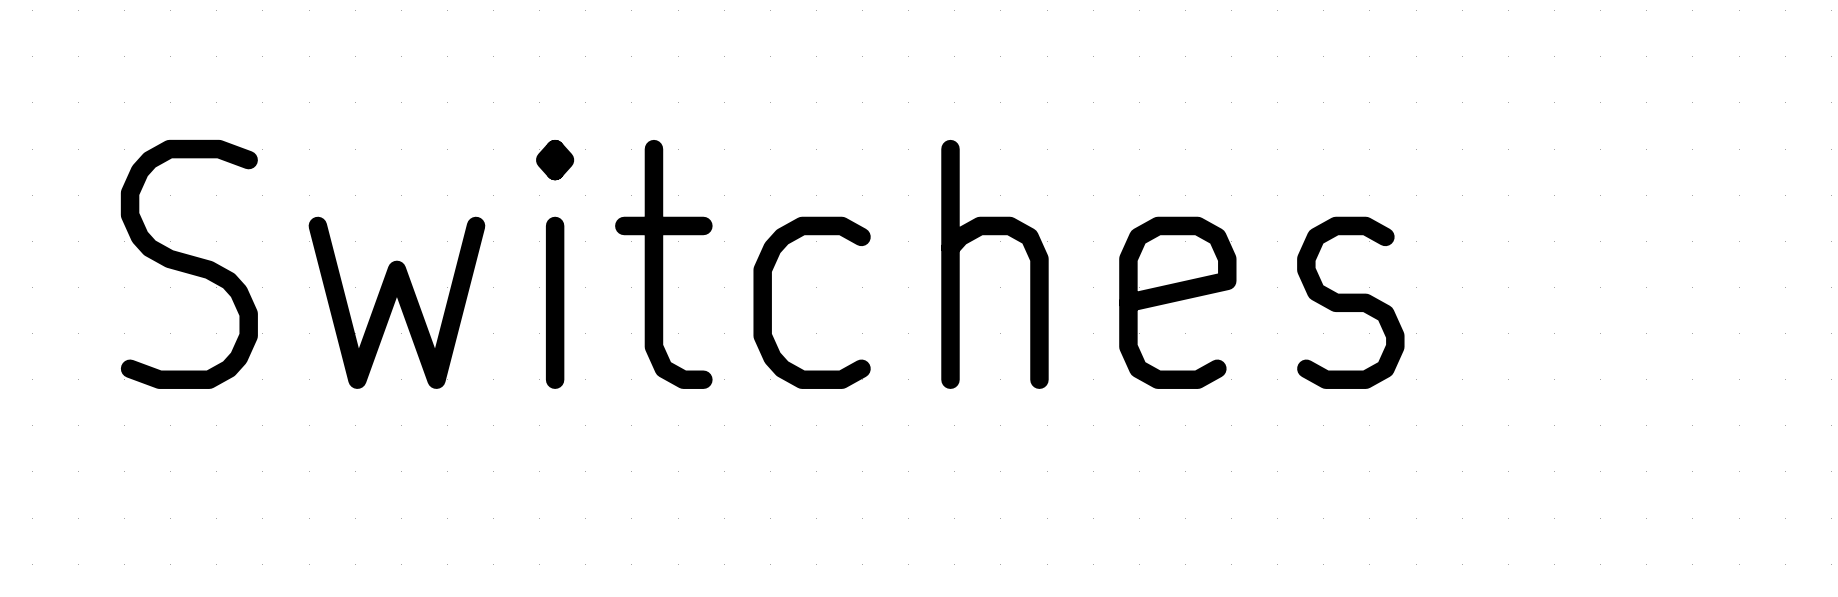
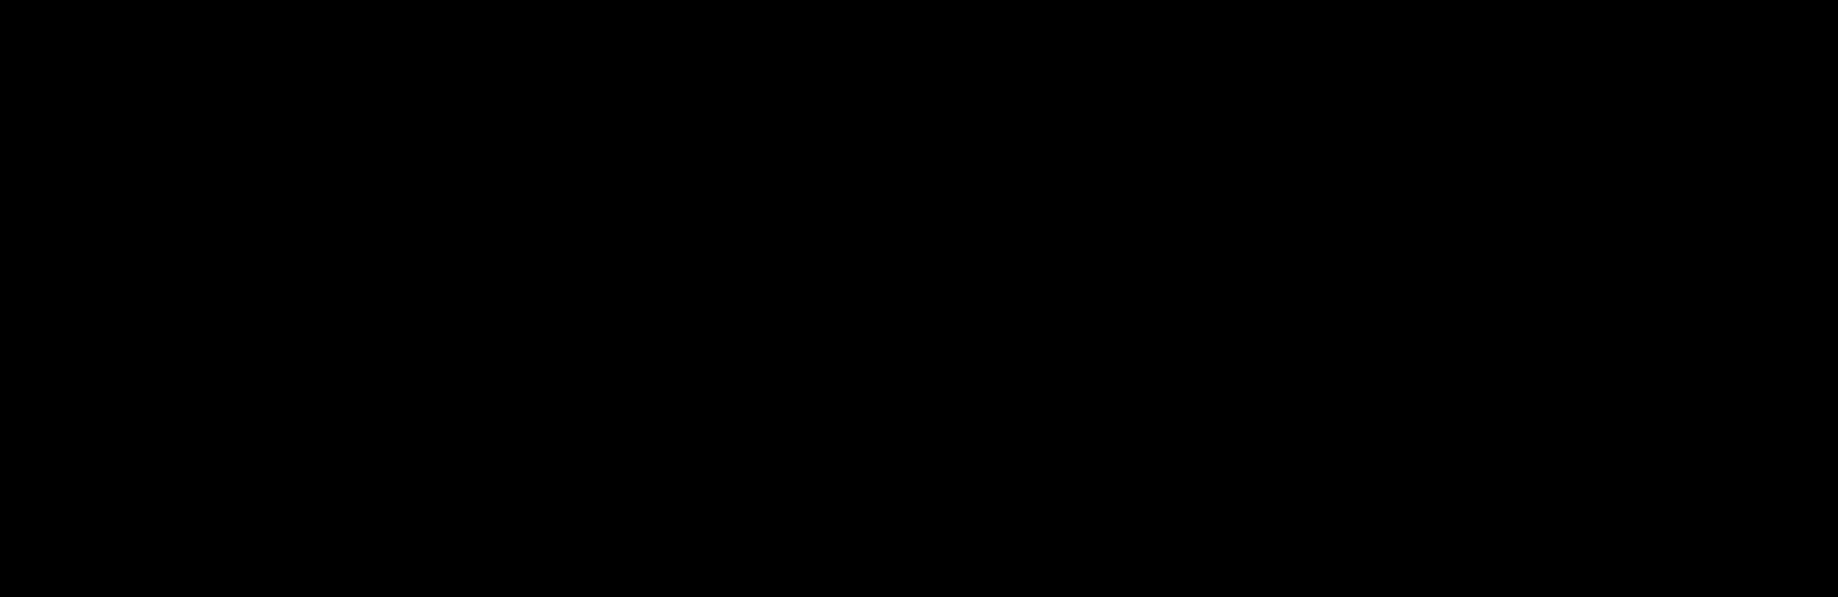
text: Switches (762, 264) -> none

